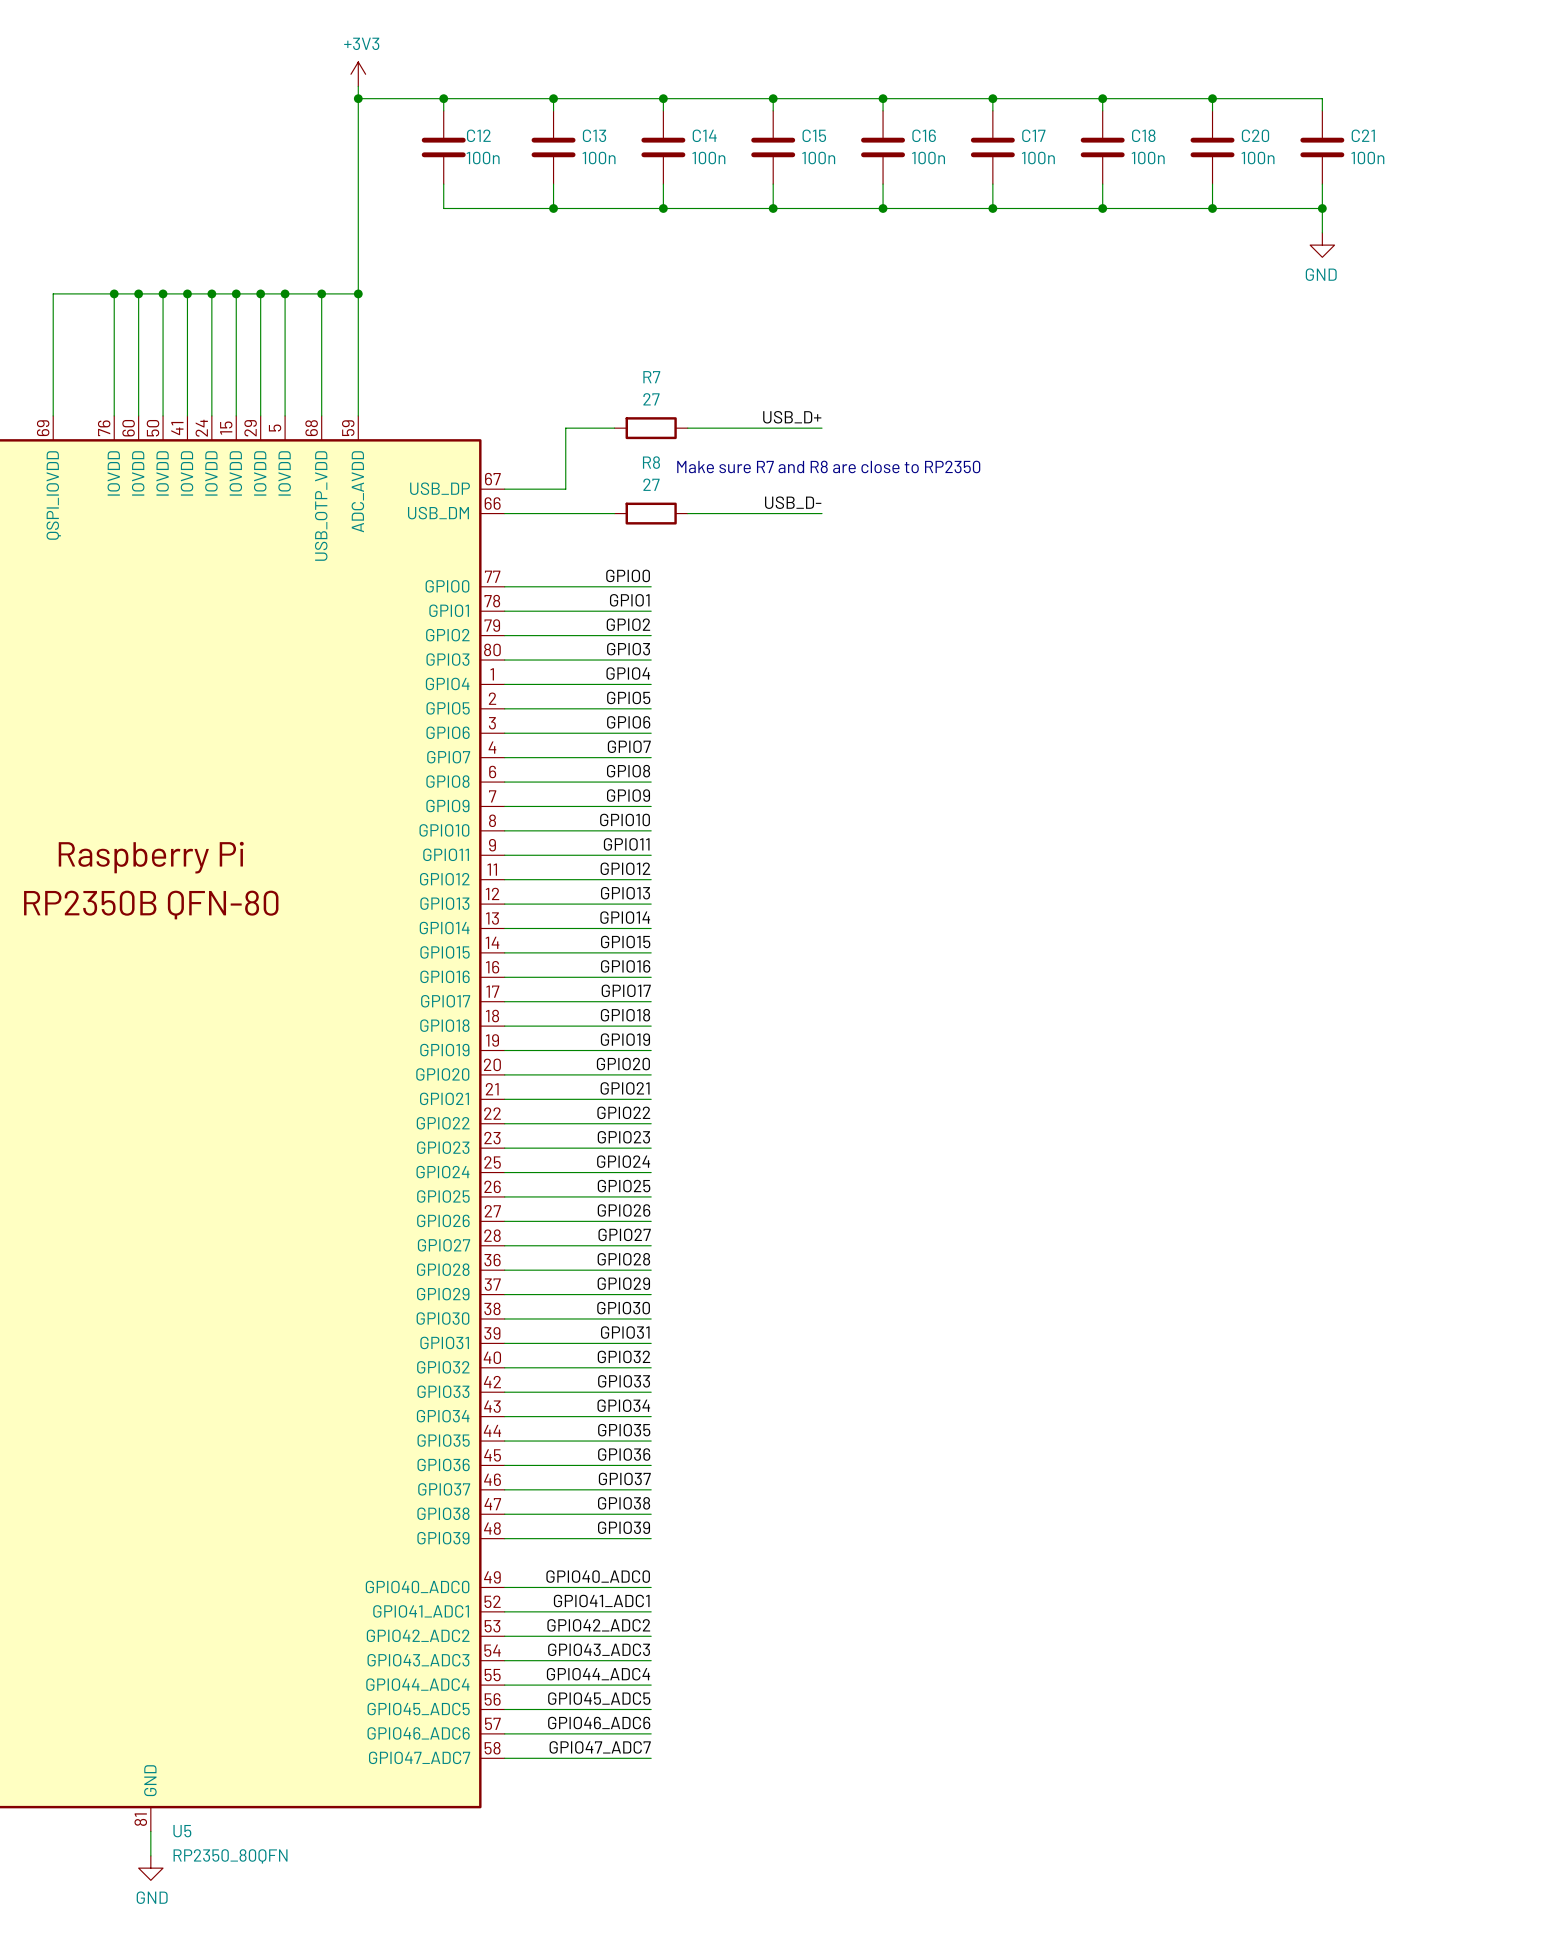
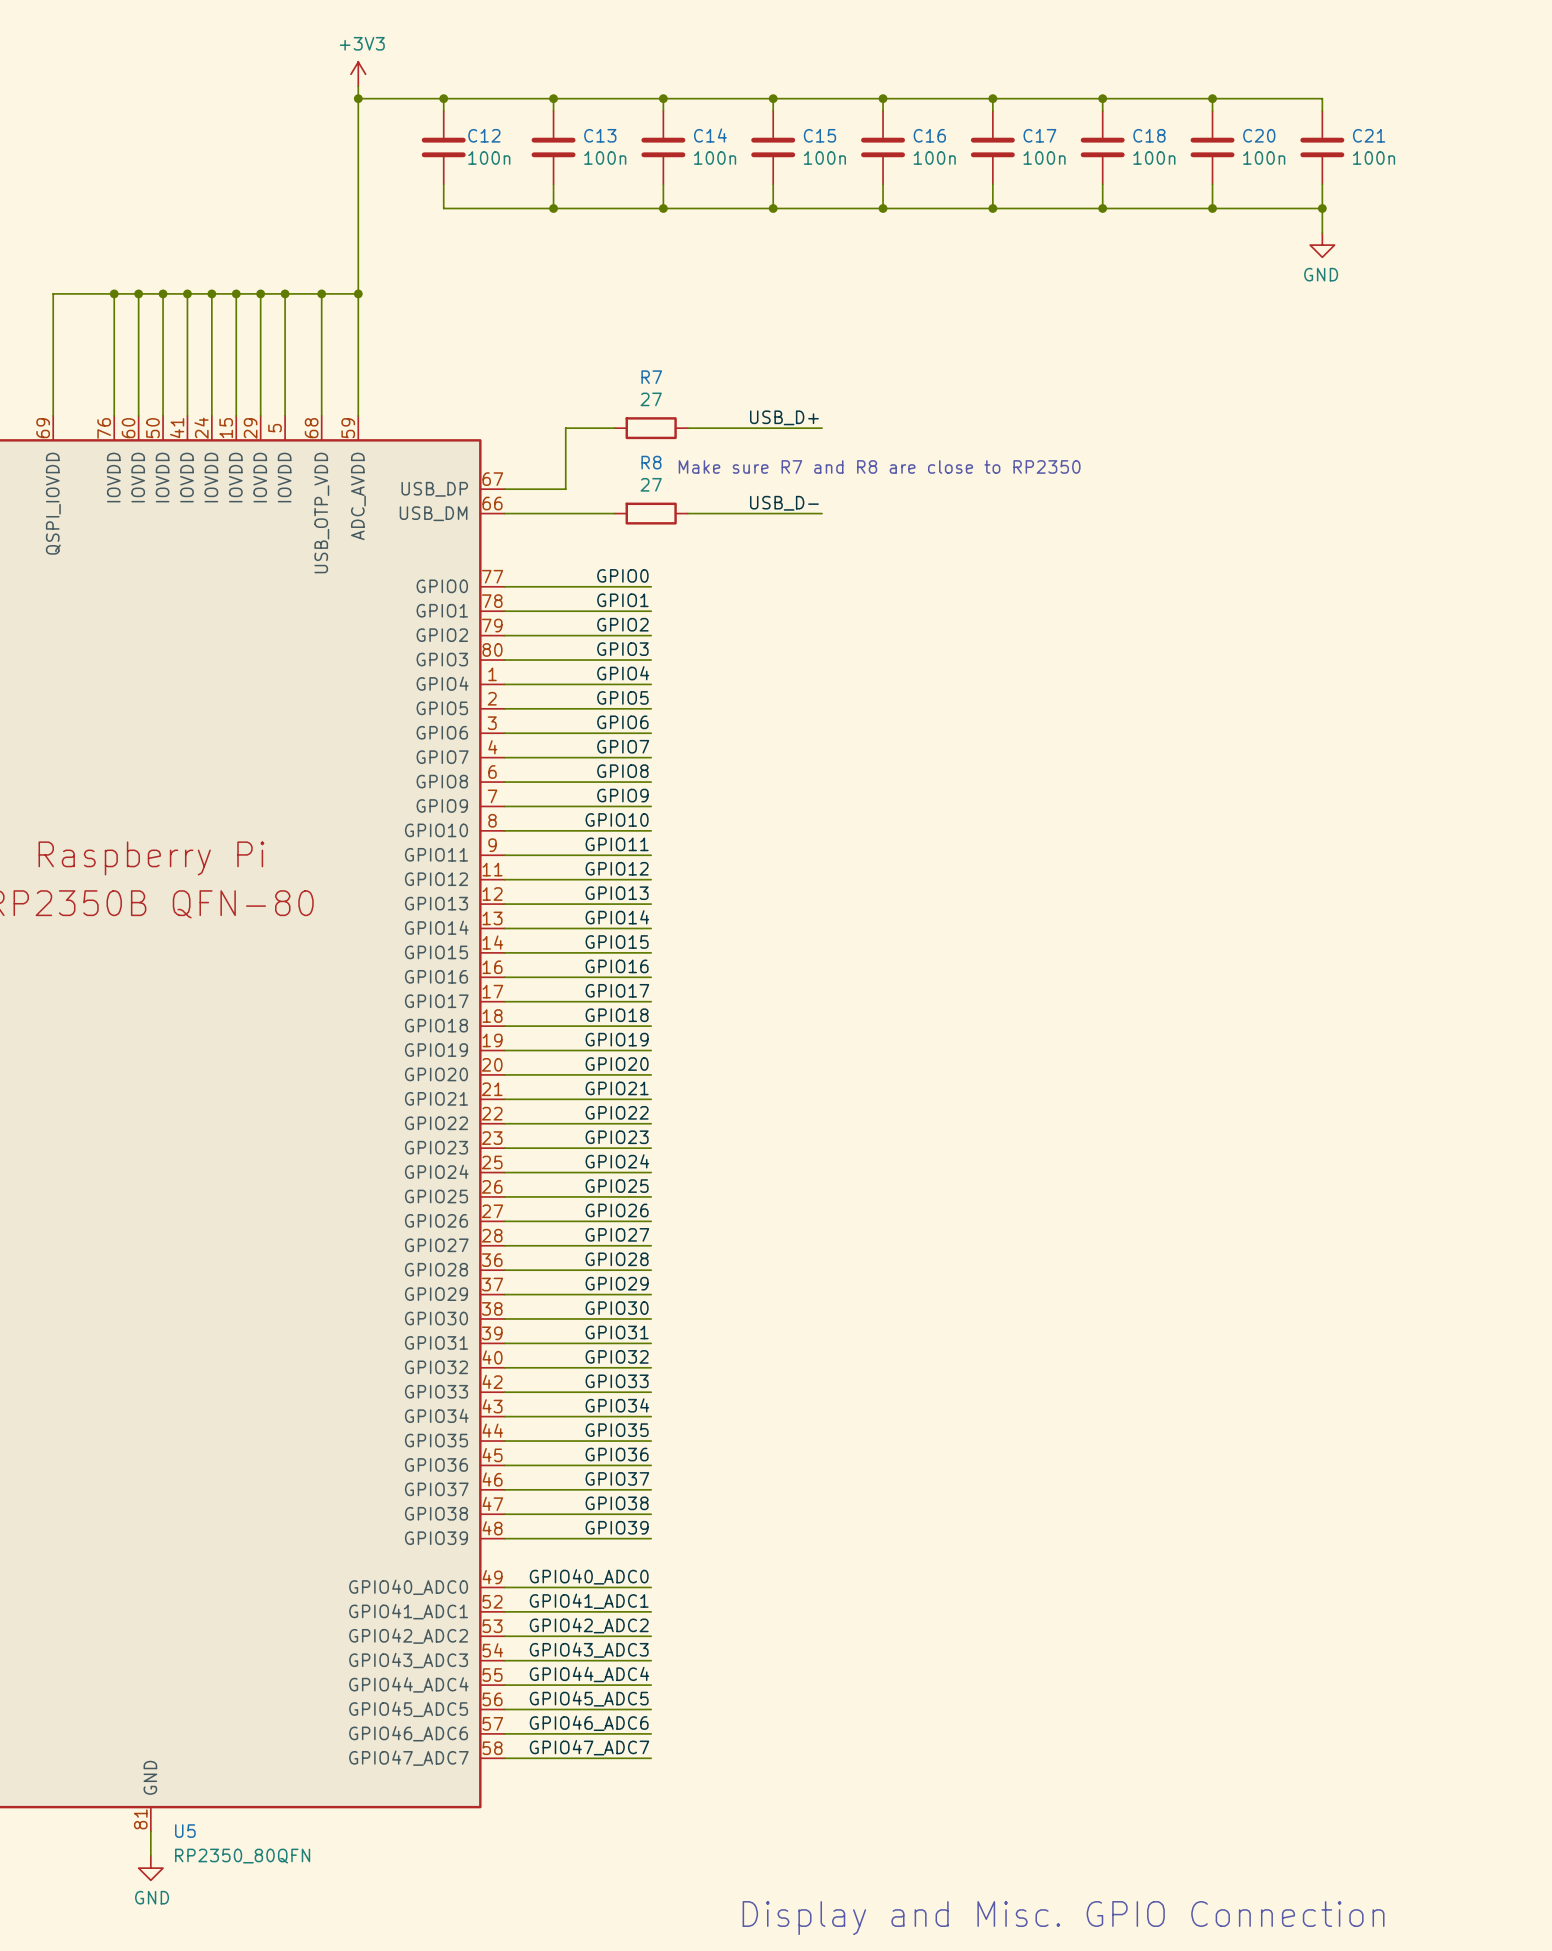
text: none -> Display and Misc. GPIO Connection (1063, 1918)

